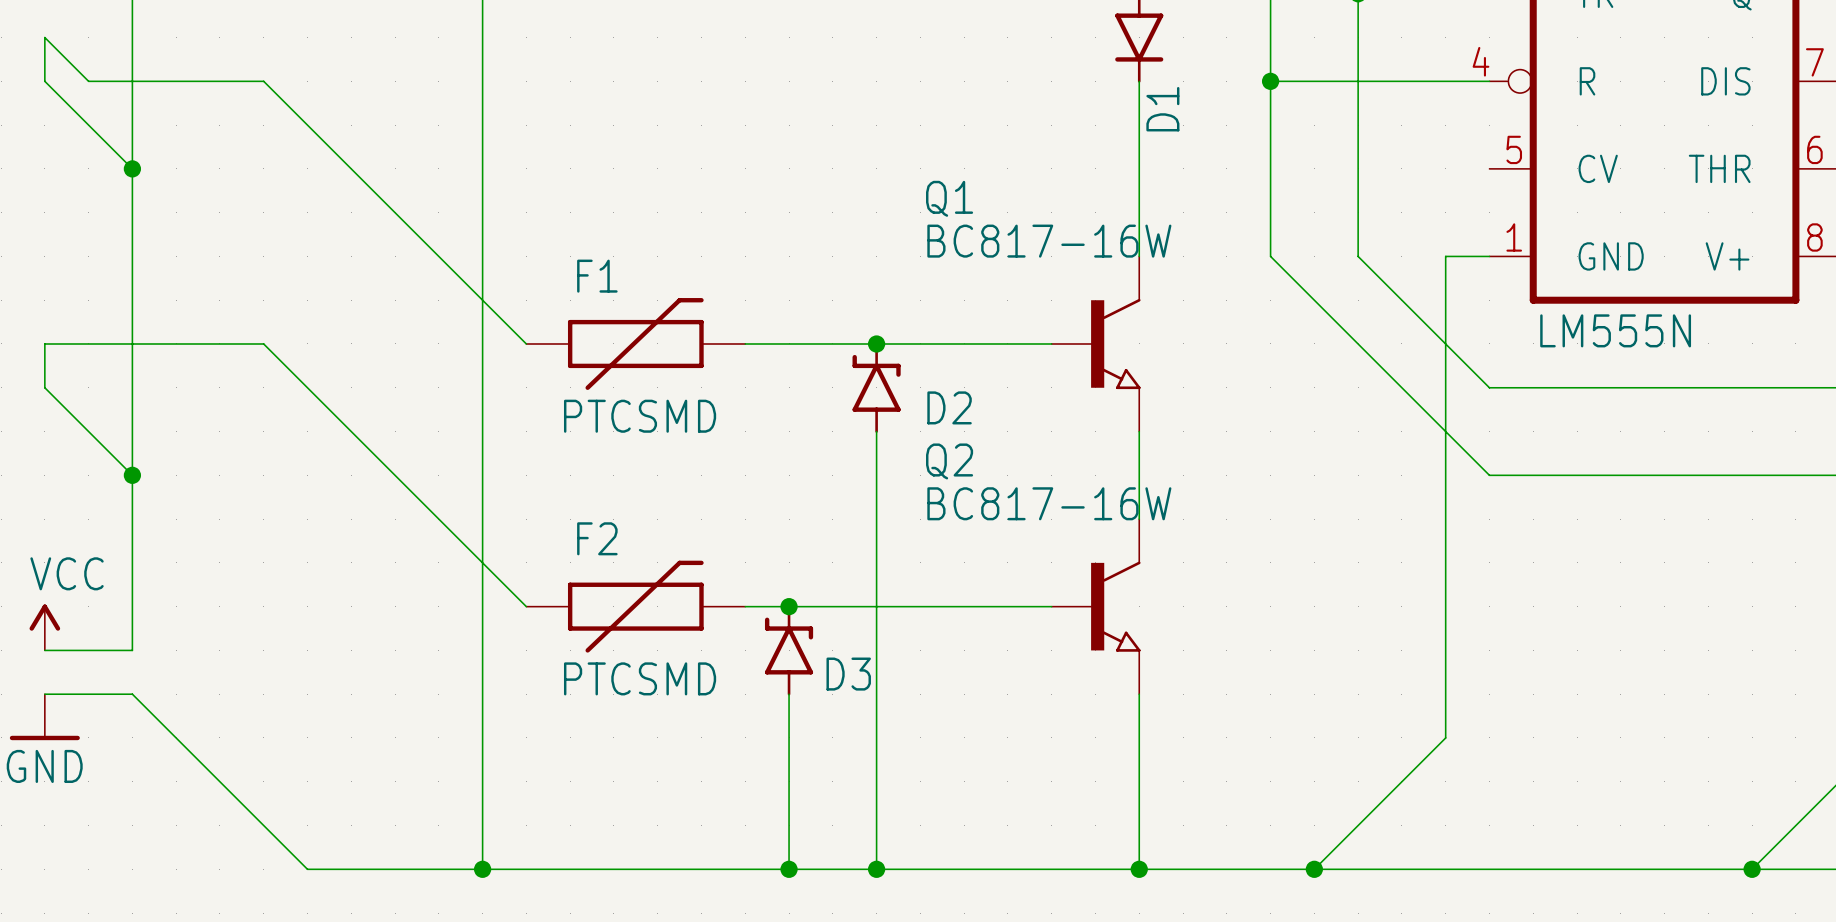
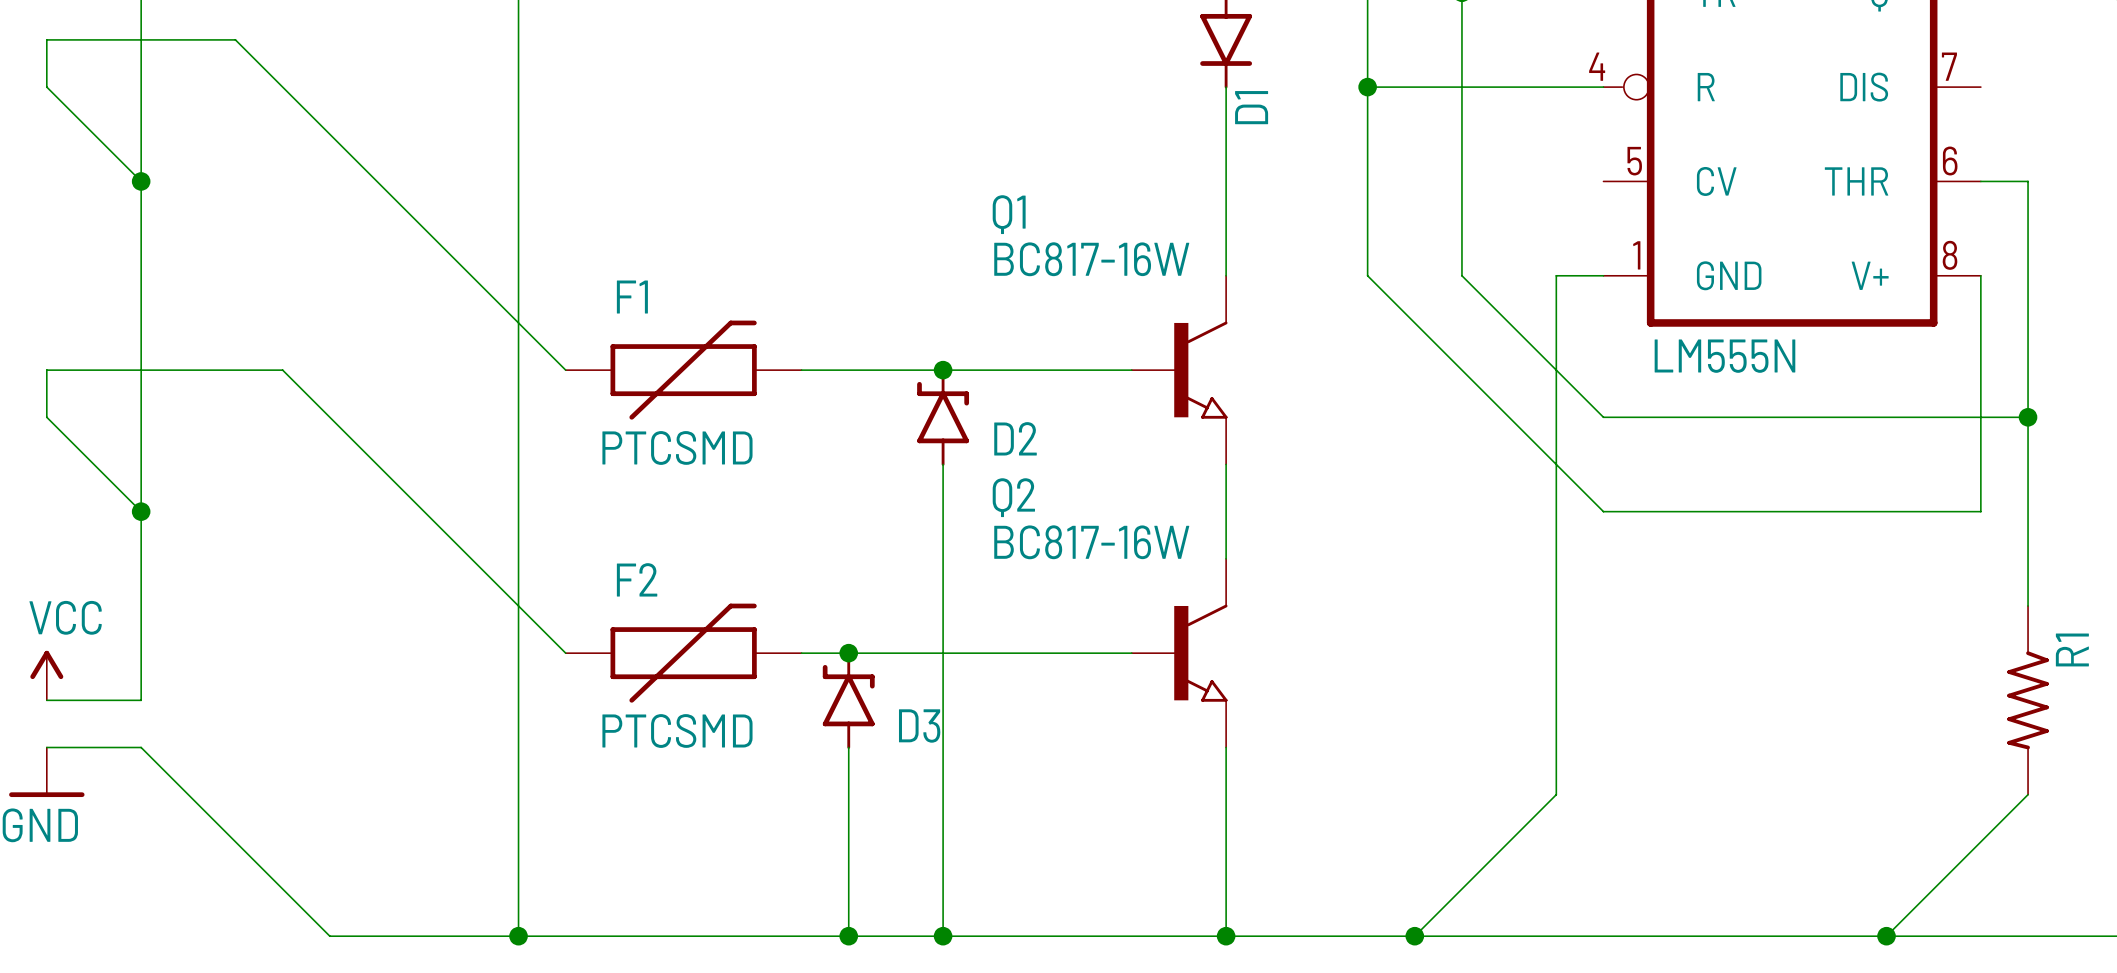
wire: (44, 37) (88, 81) (263, 81) -> (46, 39) (235, 39) (282, 87)

